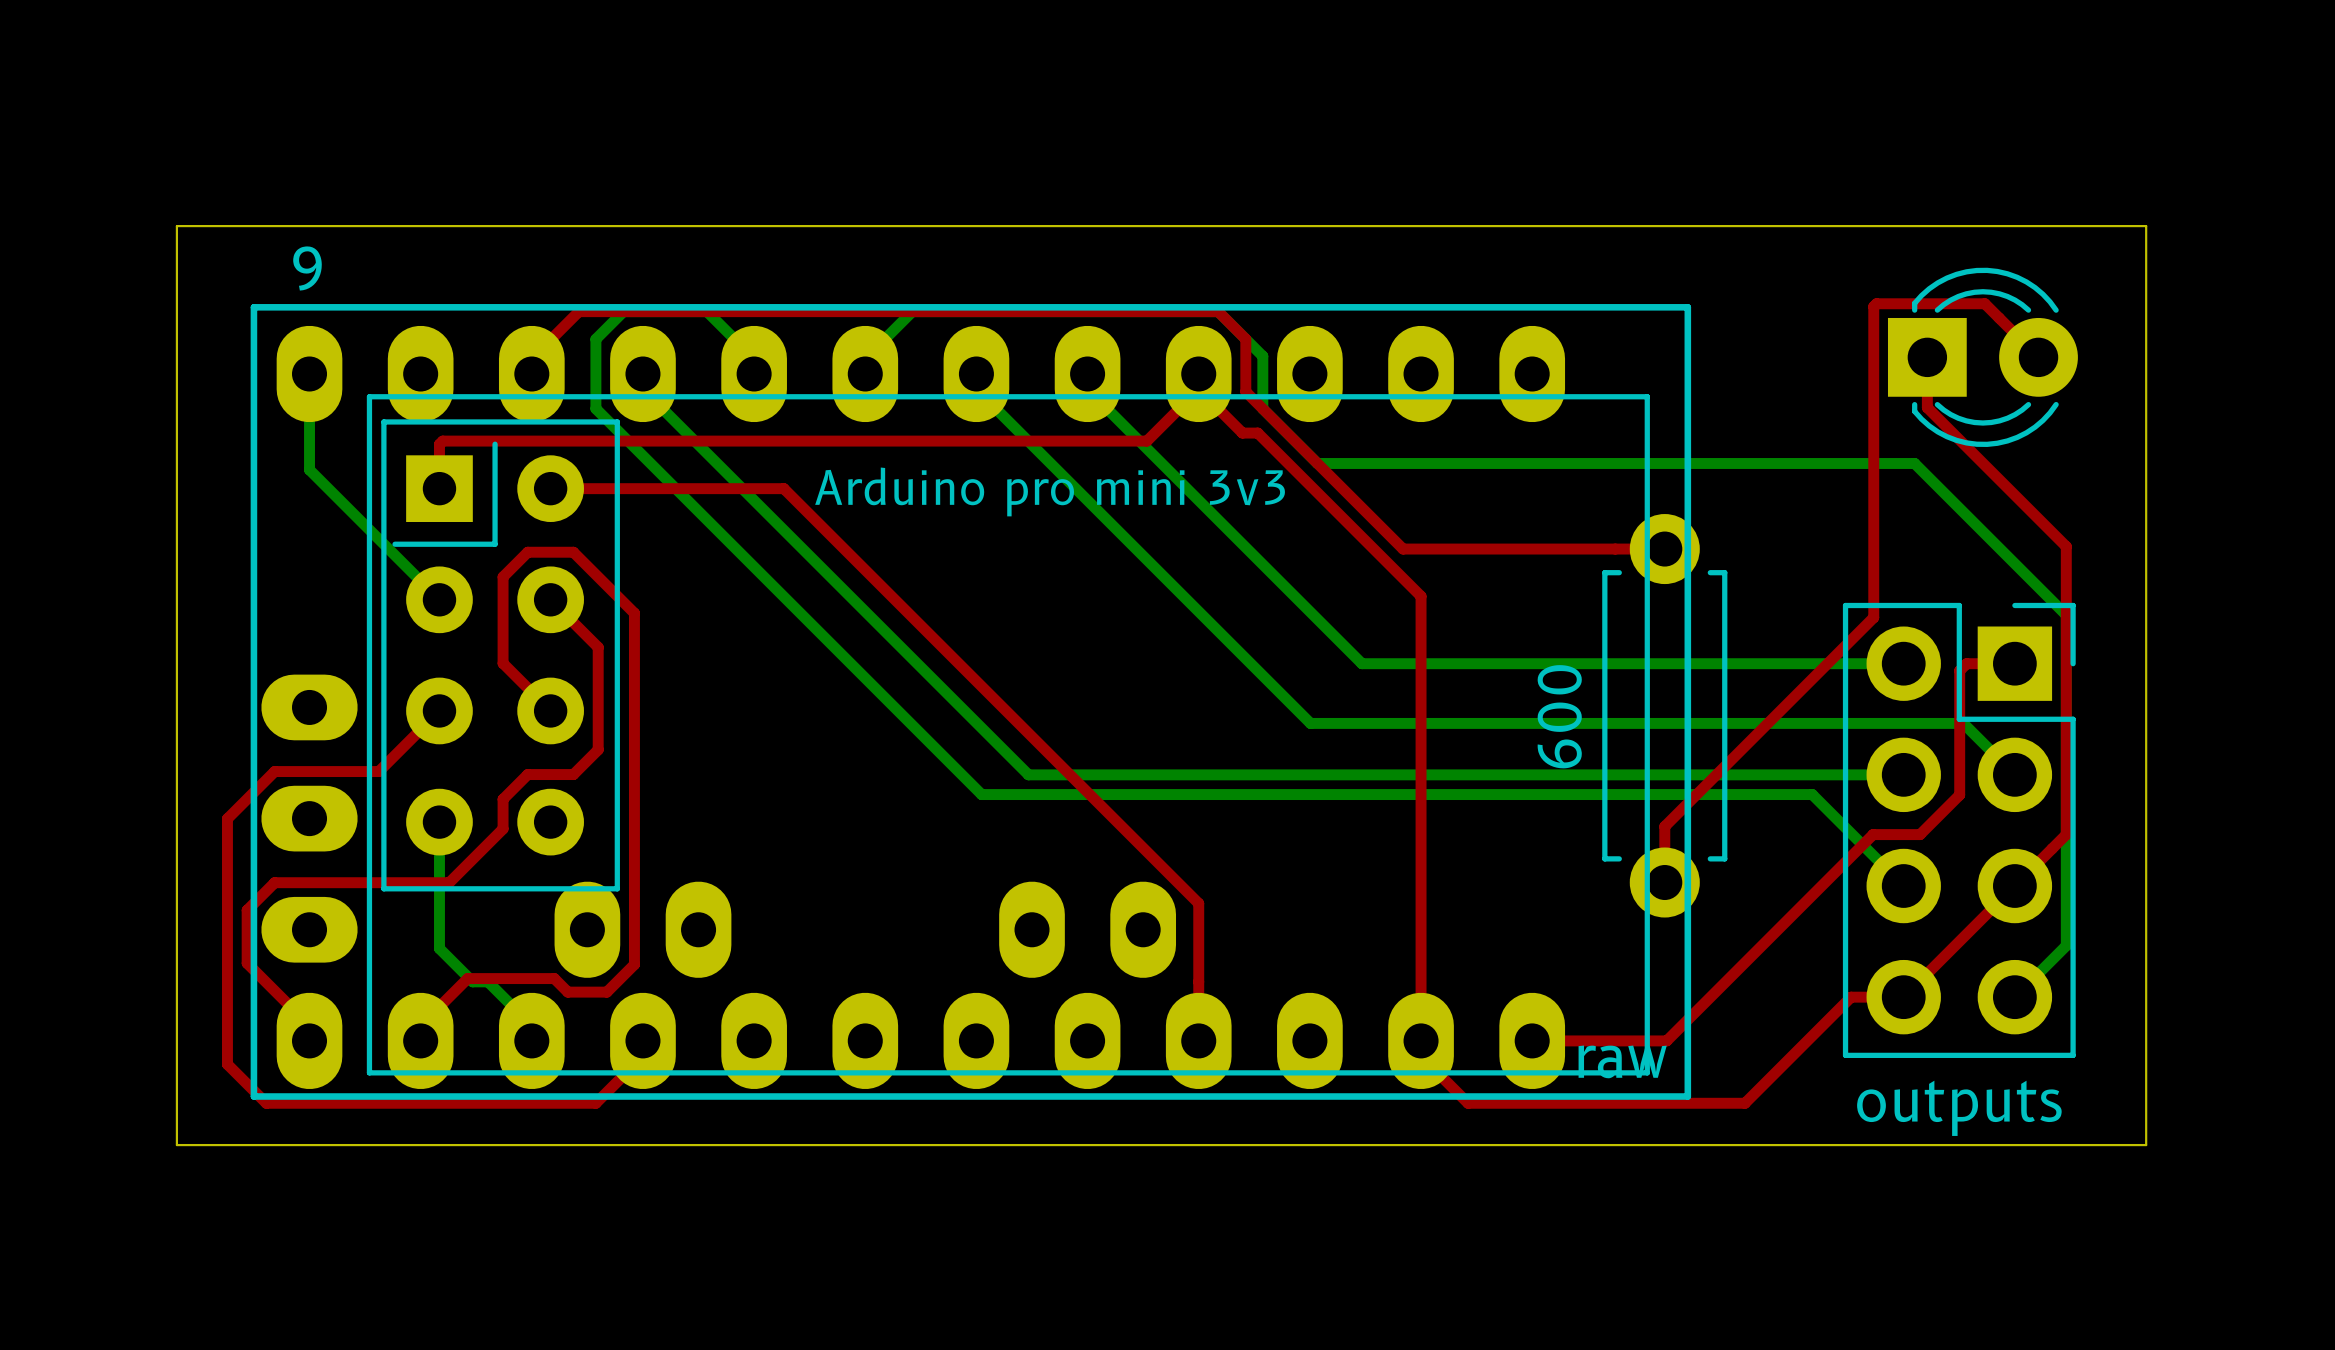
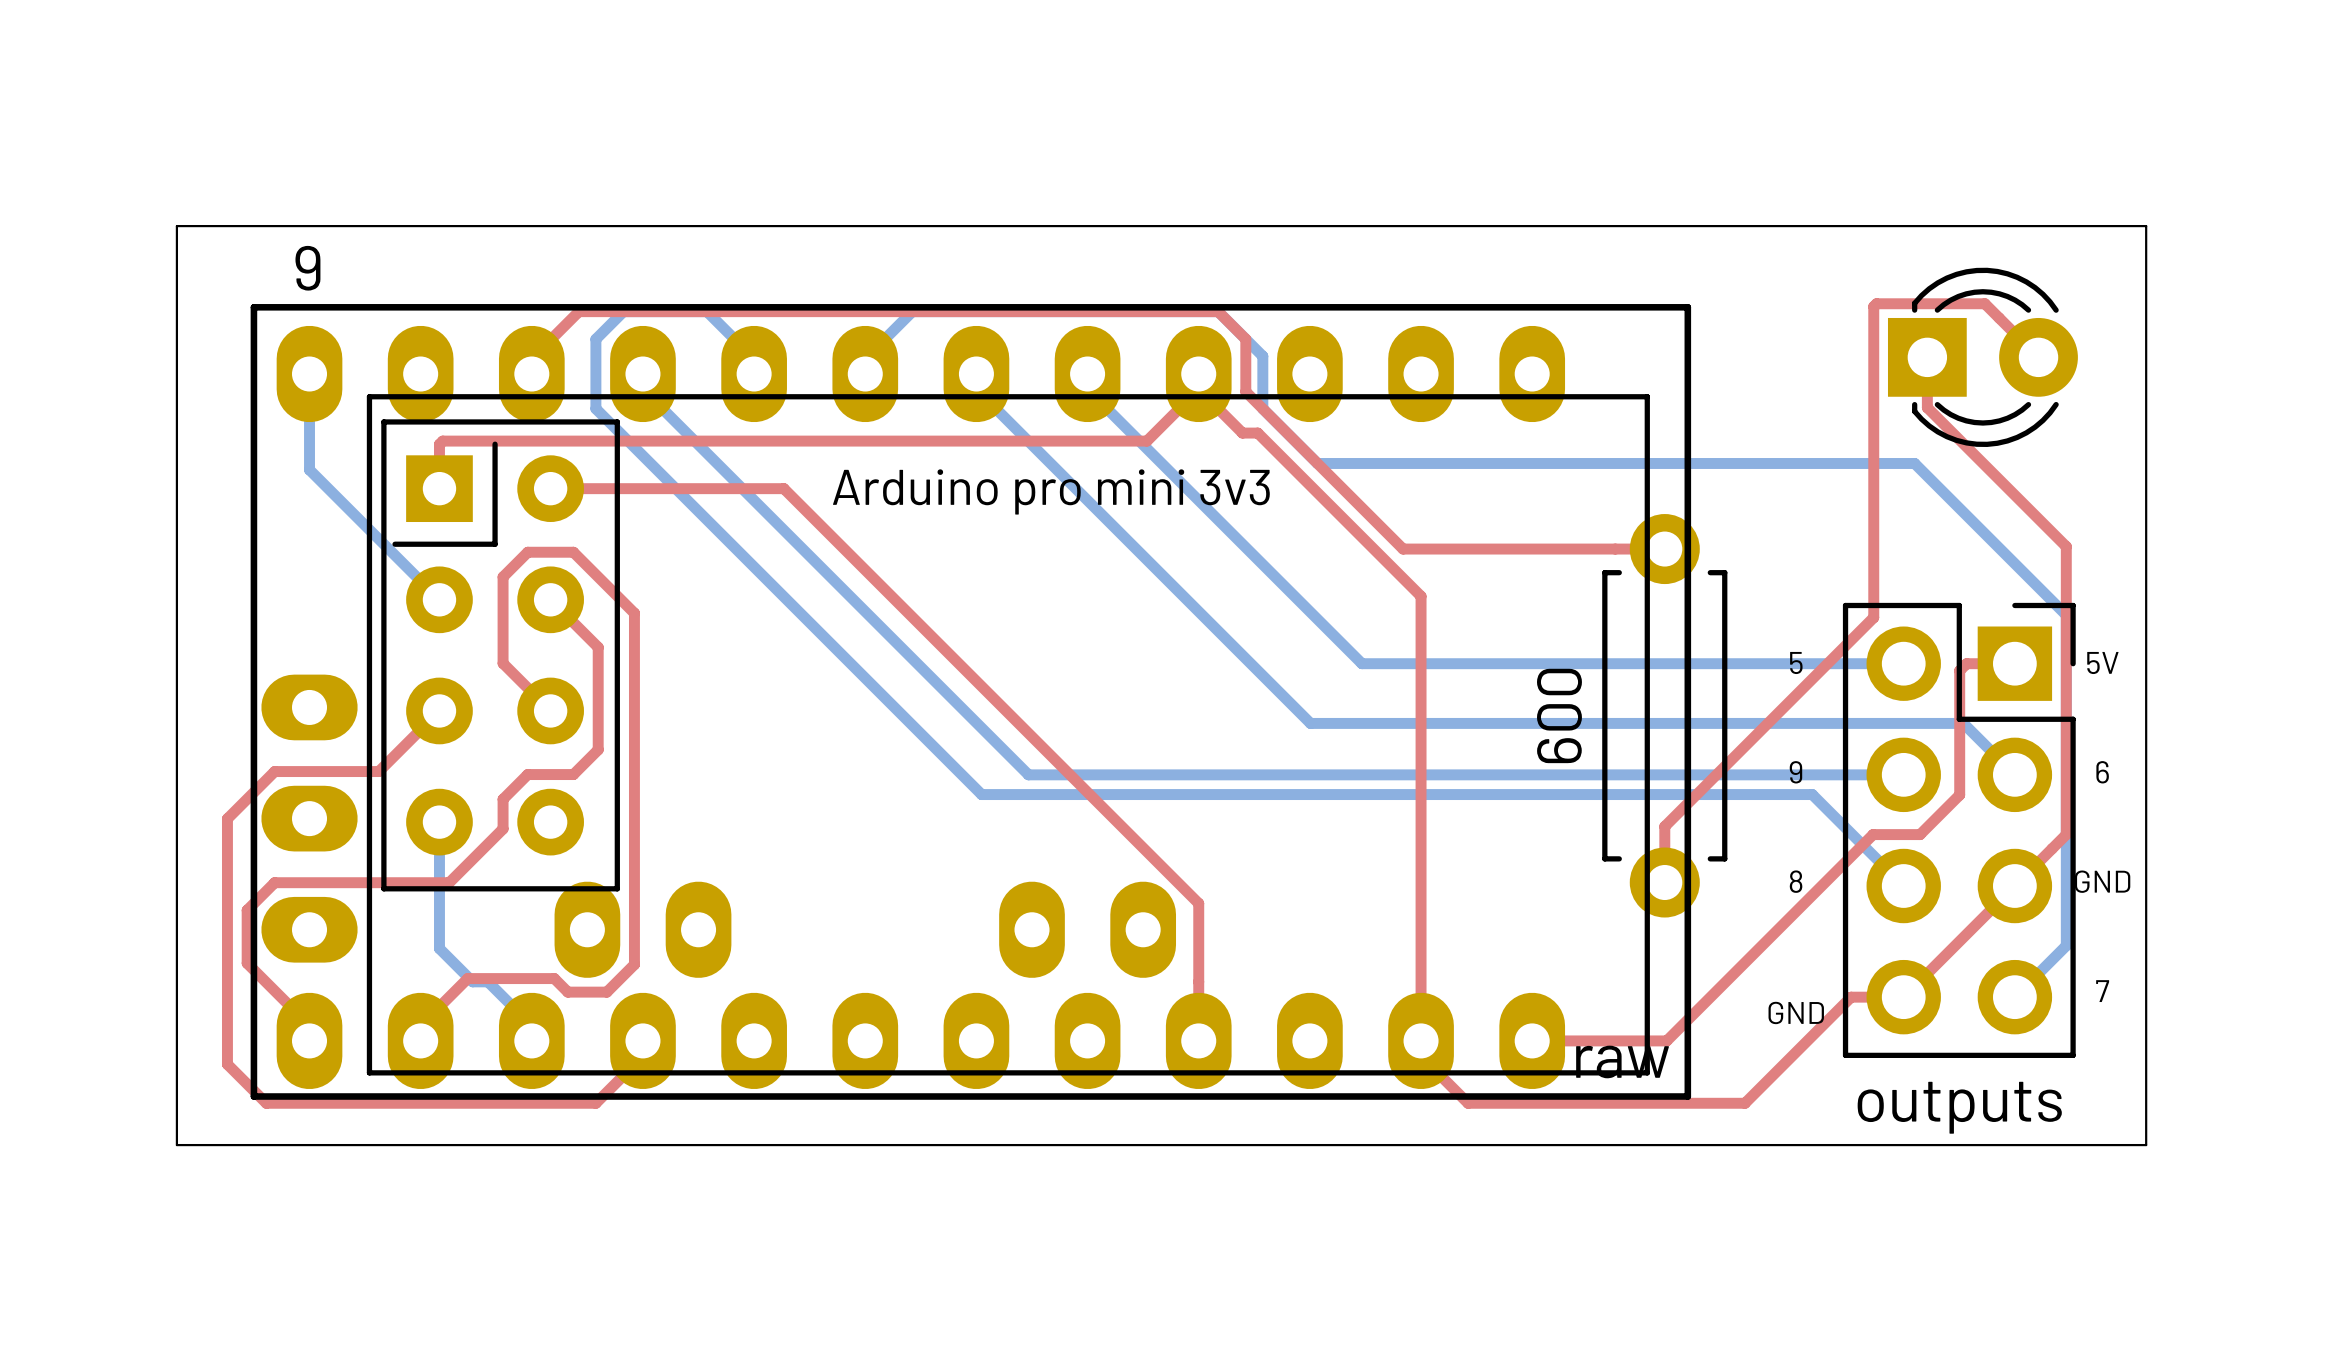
text: none -> 5 (1796, 662)
text: none -> 5V (2102, 662)
text: none -> 9 (1795, 772)
text: none -> 6 (2102, 772)
text: none -> 8 (1796, 881)
text: none -> GND (2102, 881)
text: none -> 7 (2102, 991)
text: none -> GND (1796, 1012)

